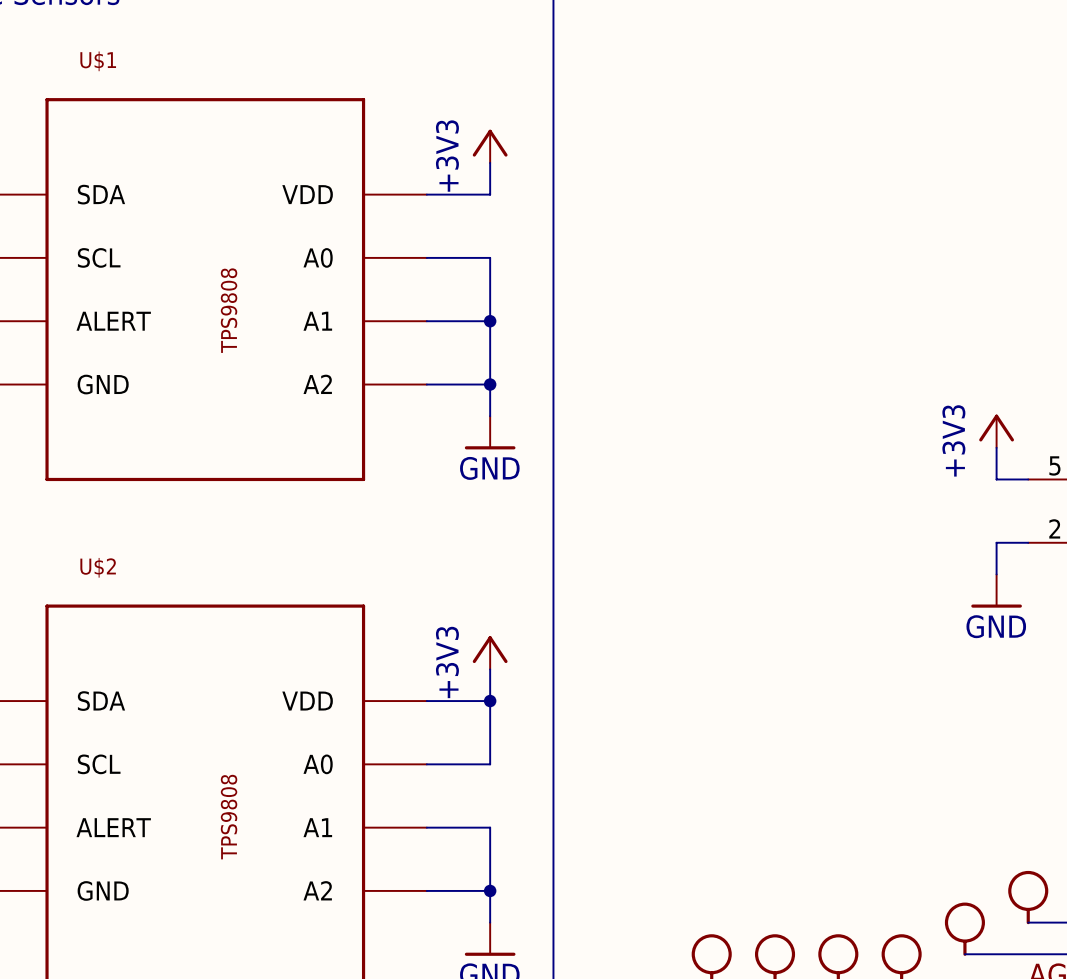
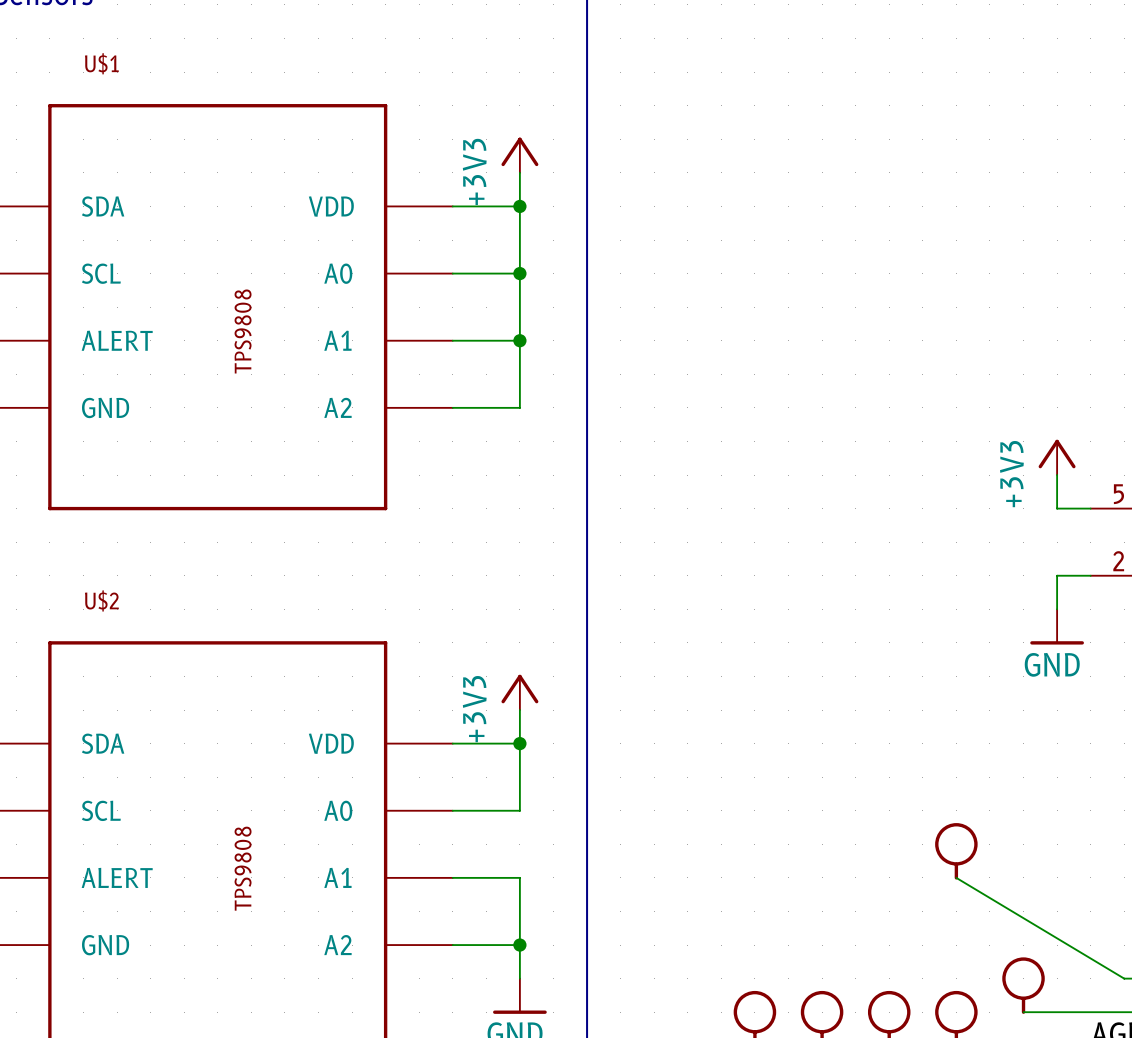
wire: none -> (519, 206) (519, 273)
junction: none -> (519, 206)
junction: none -> (519, 273)
wire: (490, 384) (490, 416) -> none
junction: (490, 384) -> none
power symbol: GND (490, 432) -> none
part position: (1028, 897) -> (956, 851)
wire: (1028, 922) (1059, 922) -> (956, 877) (1124, 978)

